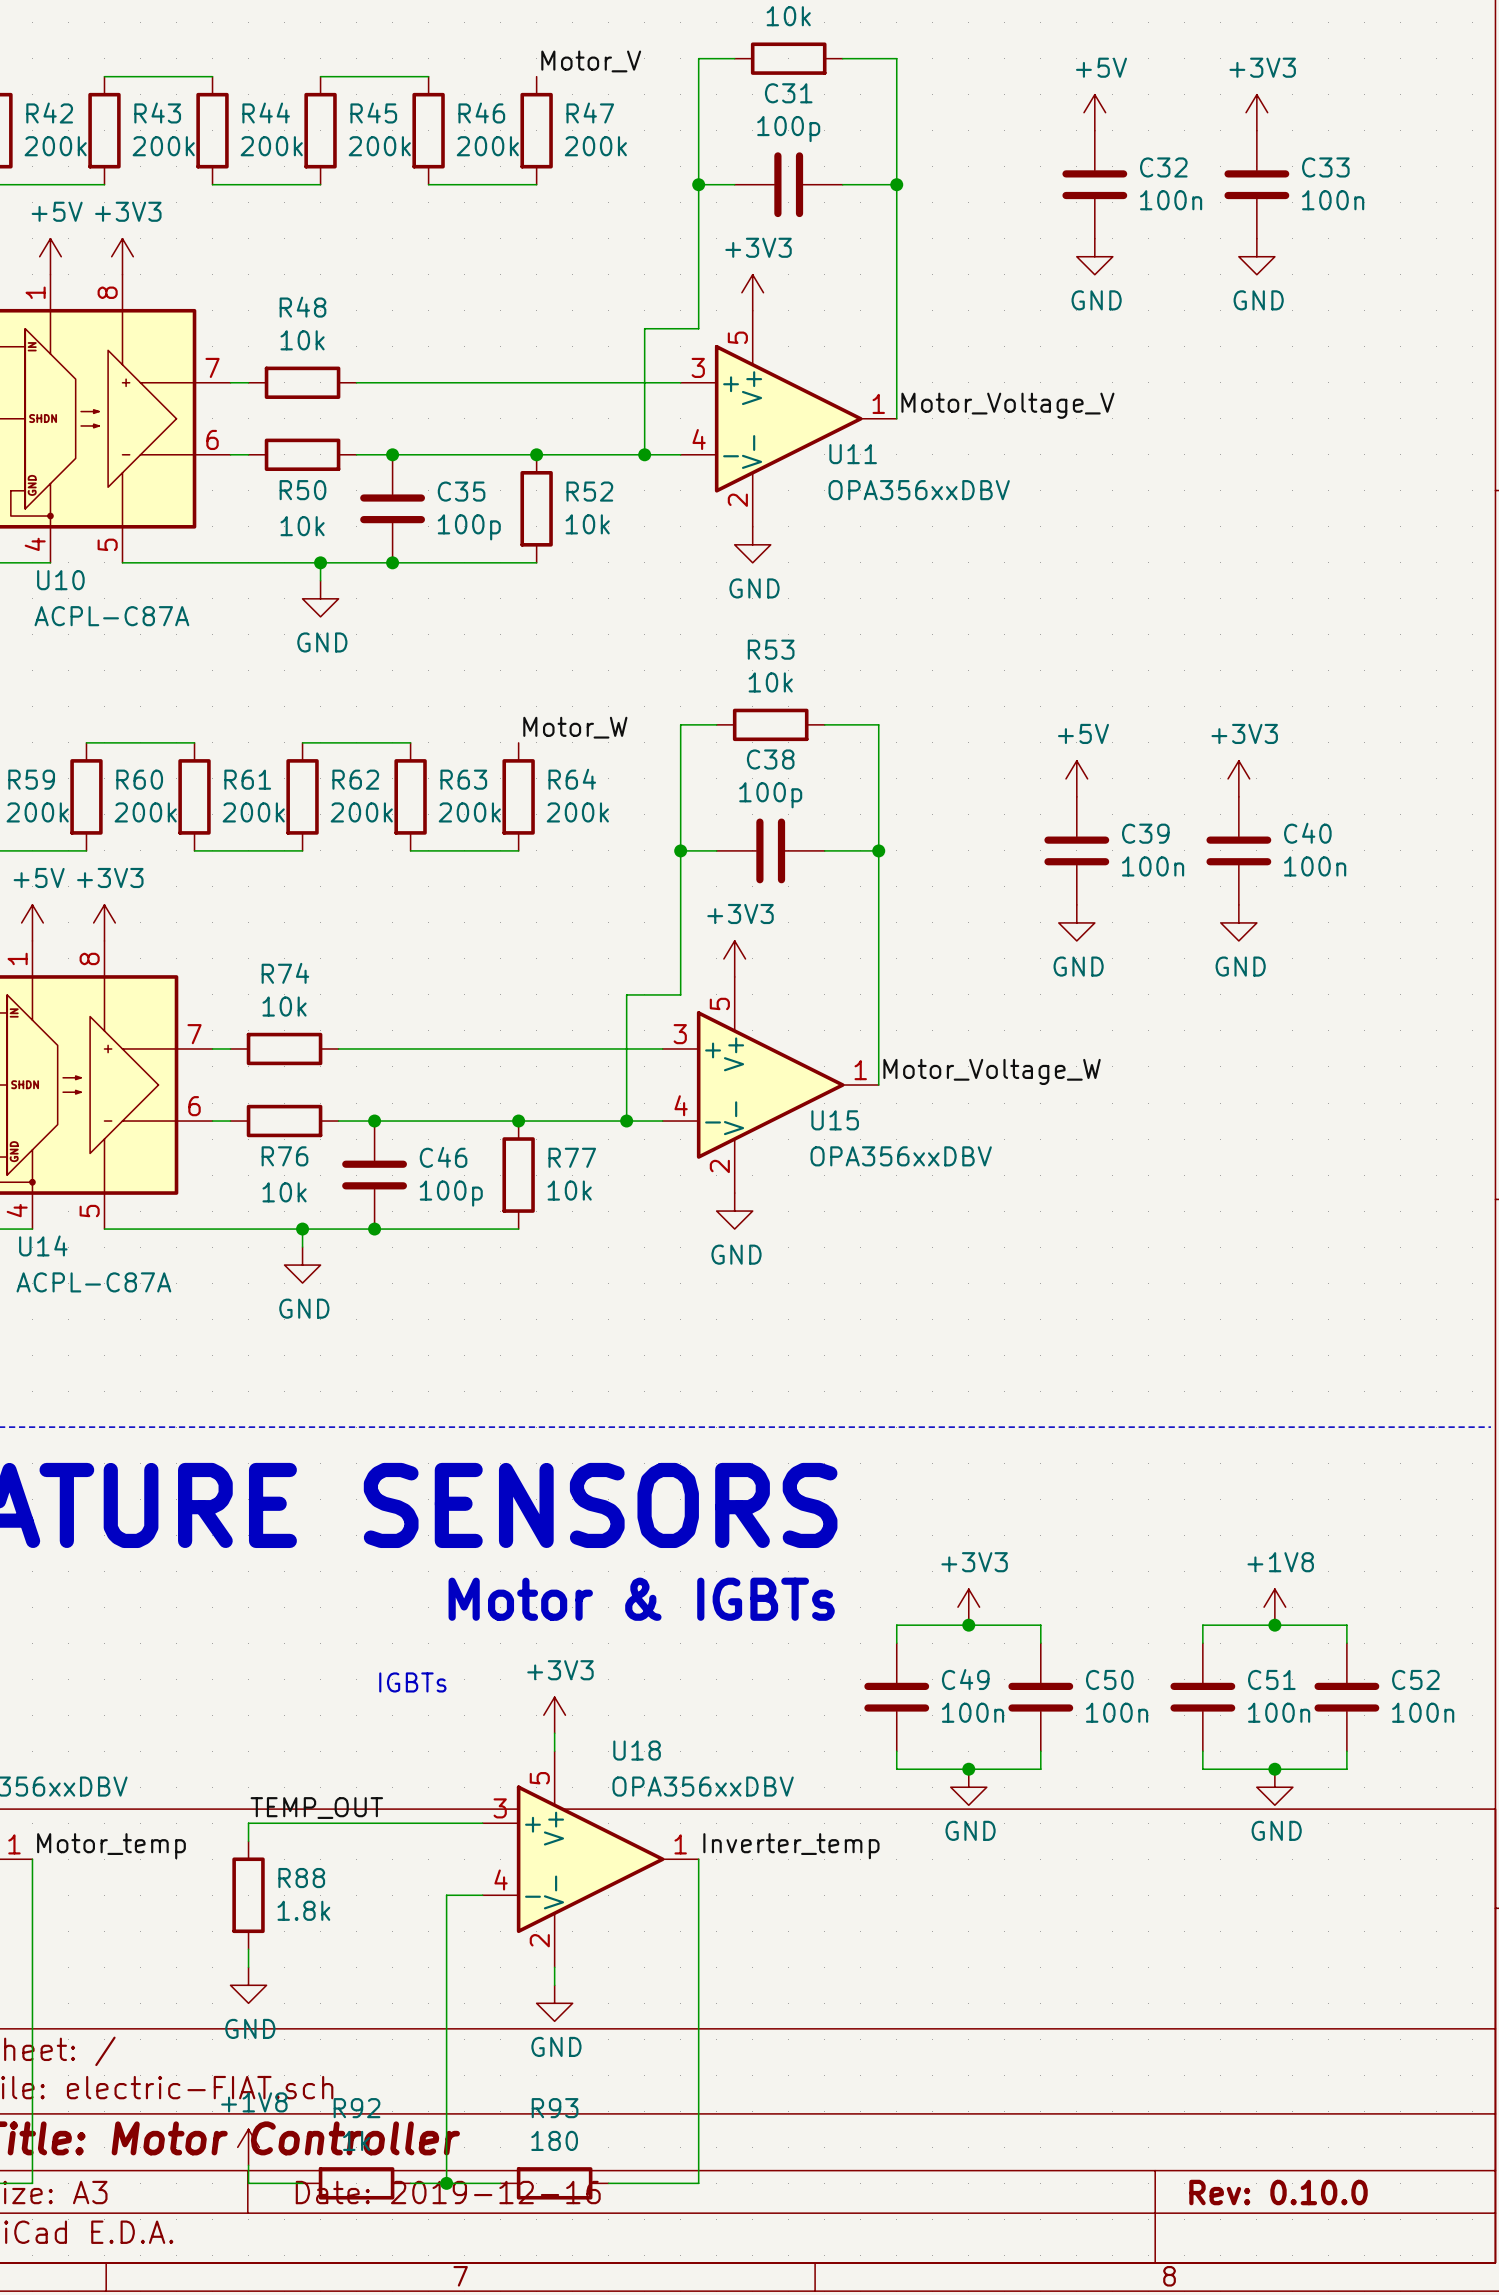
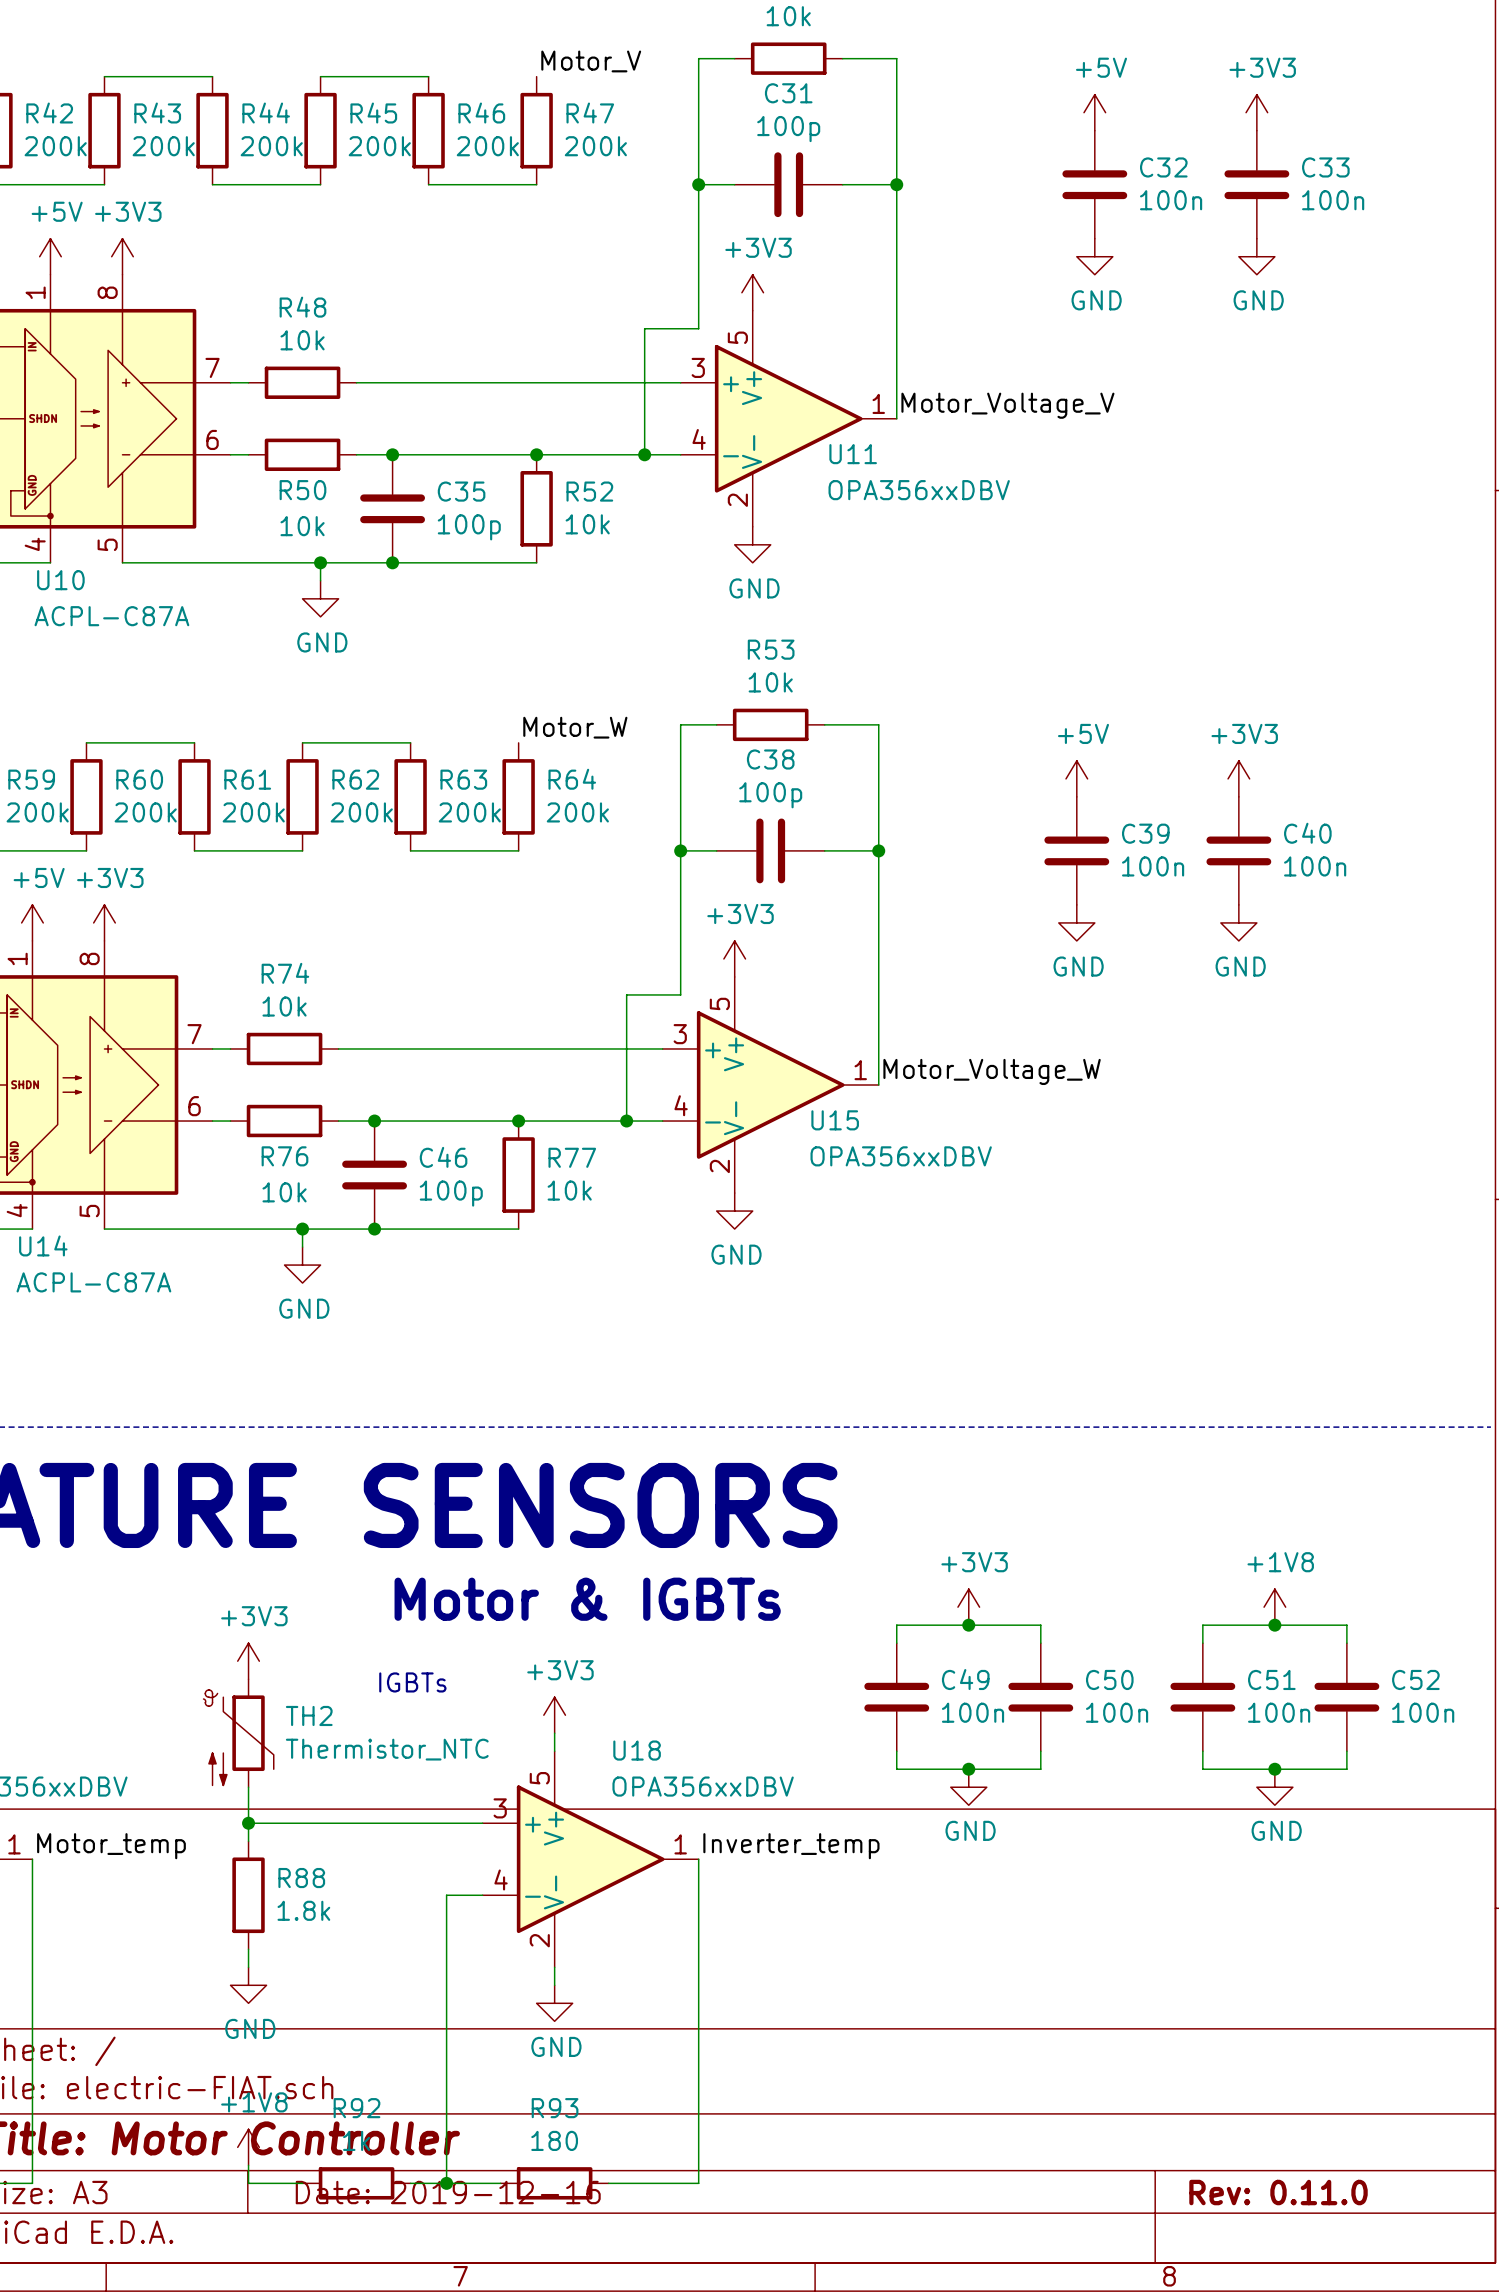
text position: Motor & IGBTs (641, 1599) -> Motor & IGBTs (587, 1599)
power symbol: none -> +3V3 (248, 1661)
TH2: none -> Thermistor_NTC (238, 1733)
wire: none -> (248, 1787) (248, 1823)
label: TEMP_OUT (316, 1808) -> none
junction: none -> (248, 1823)
title block: Rev: 0.10.0 (1278, 2192) -> Rev: 0.11.0 (1278, 2192)

